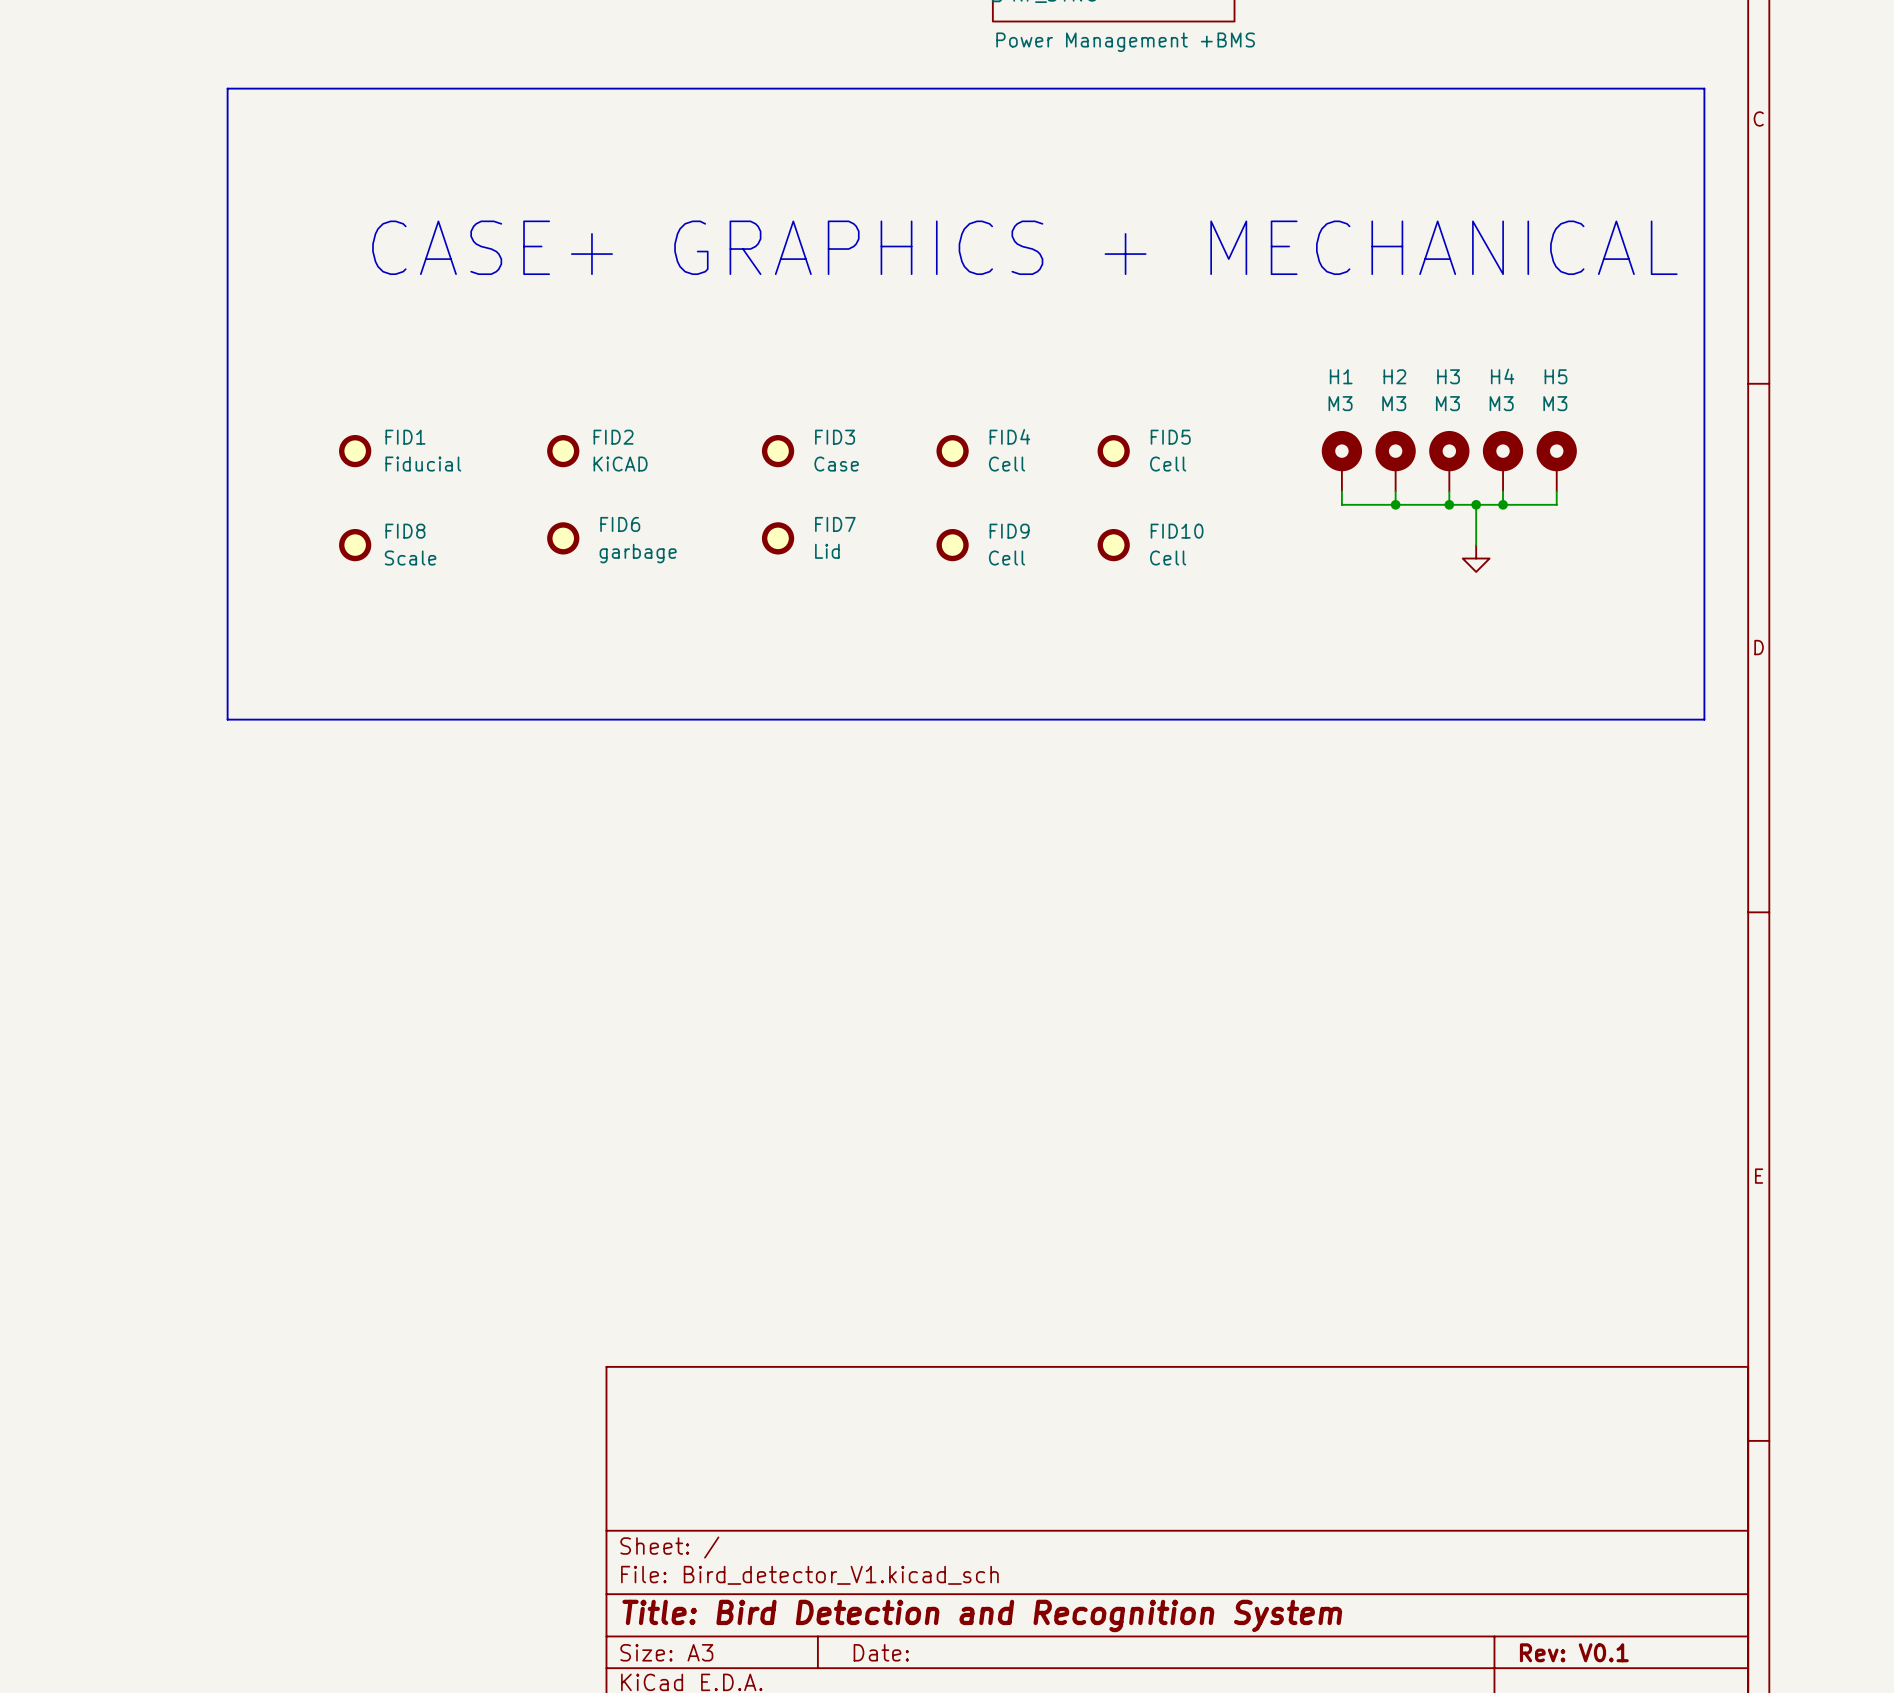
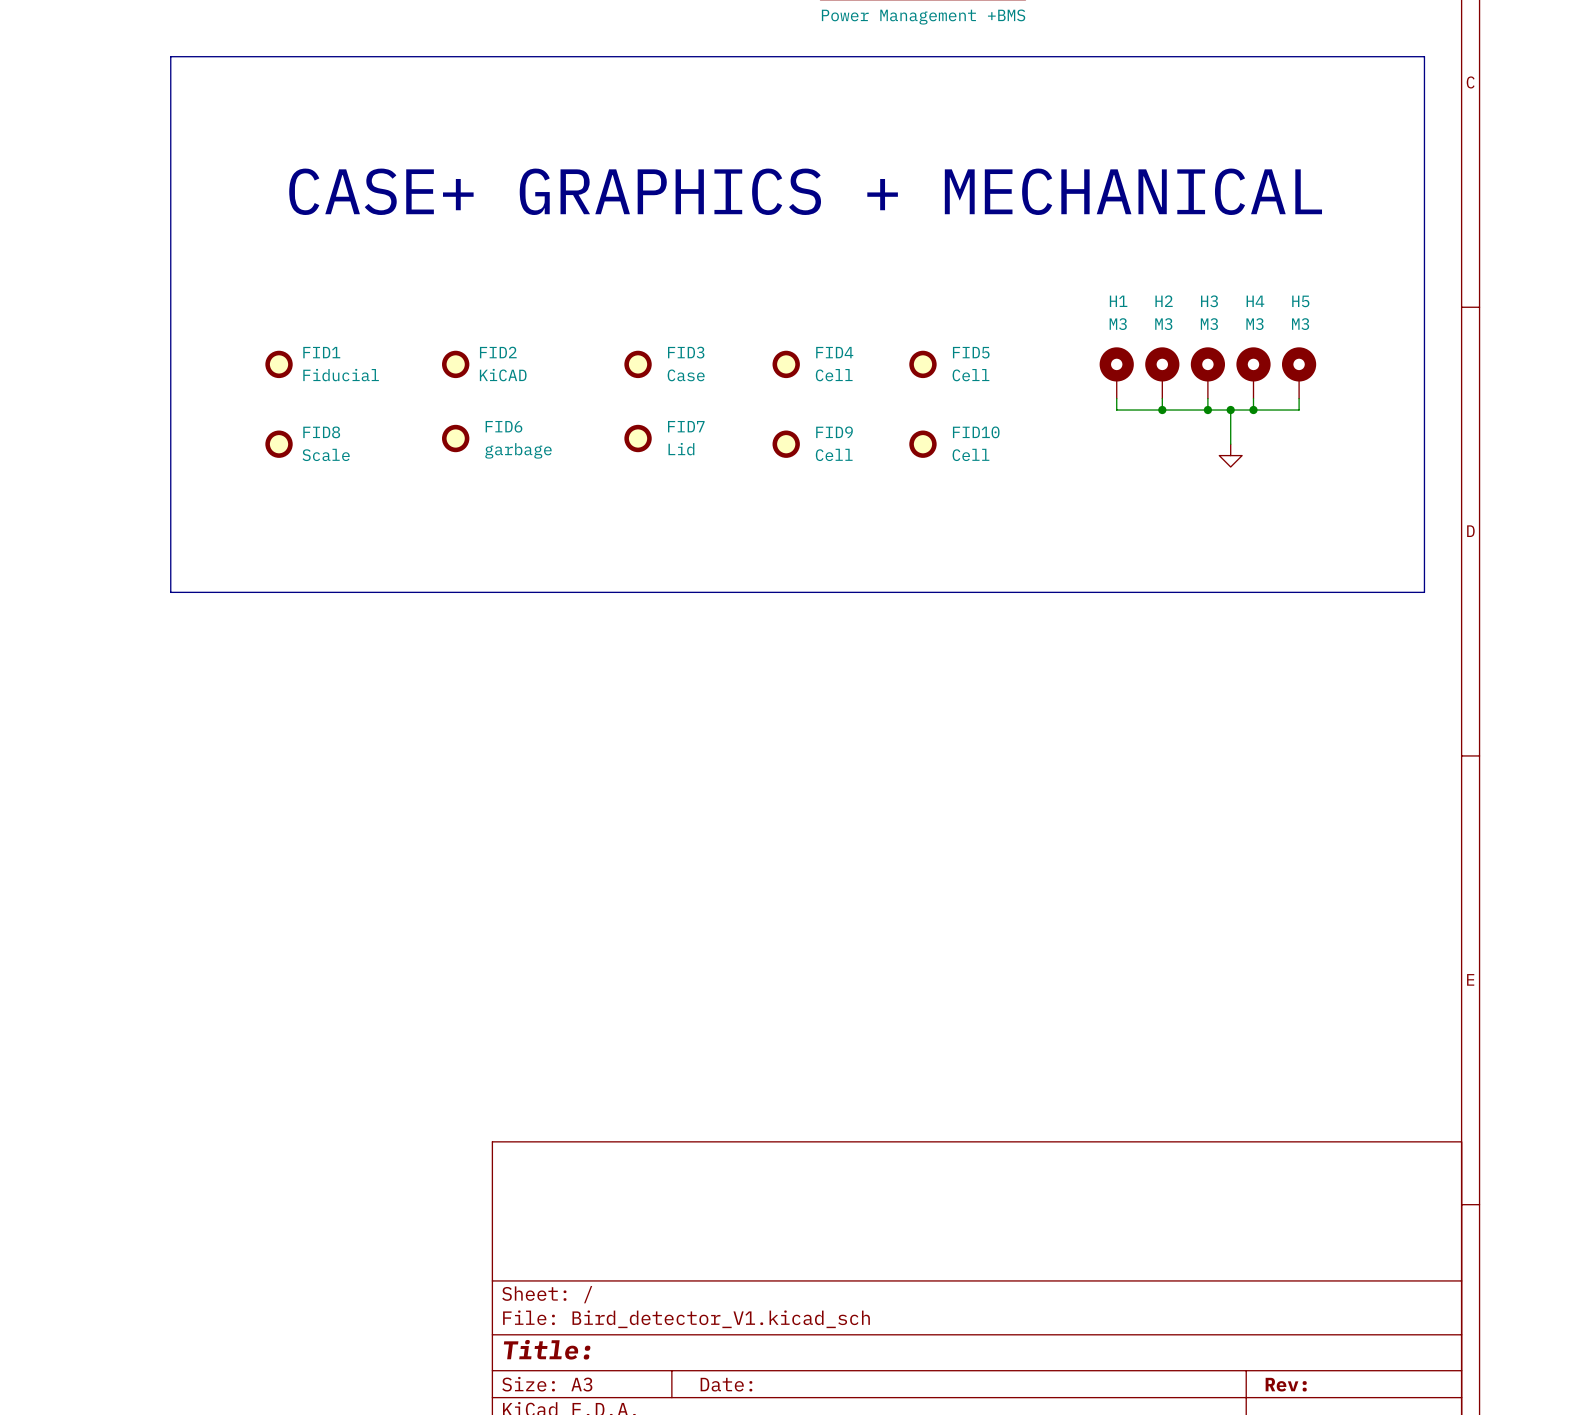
title block: Title: Bird Detection and Recognition System (982, 1615) -> Title: (547, 1349)
title block: Rev: V0.1 (1574, 1652) -> Rev: (1286, 1384)

